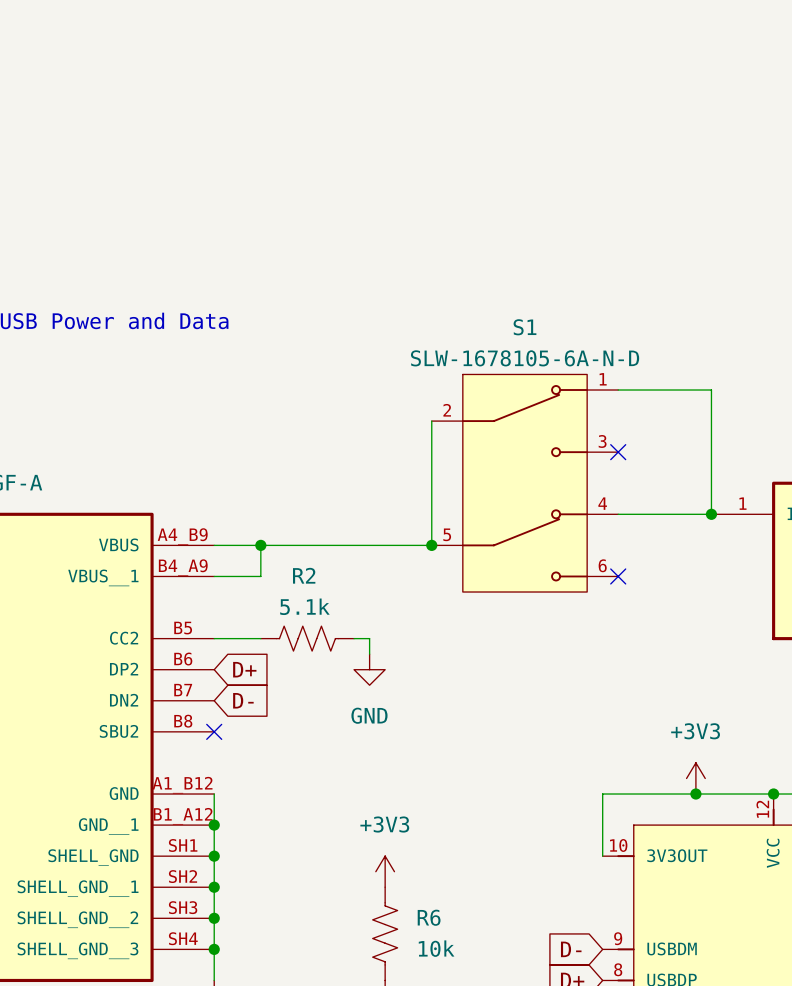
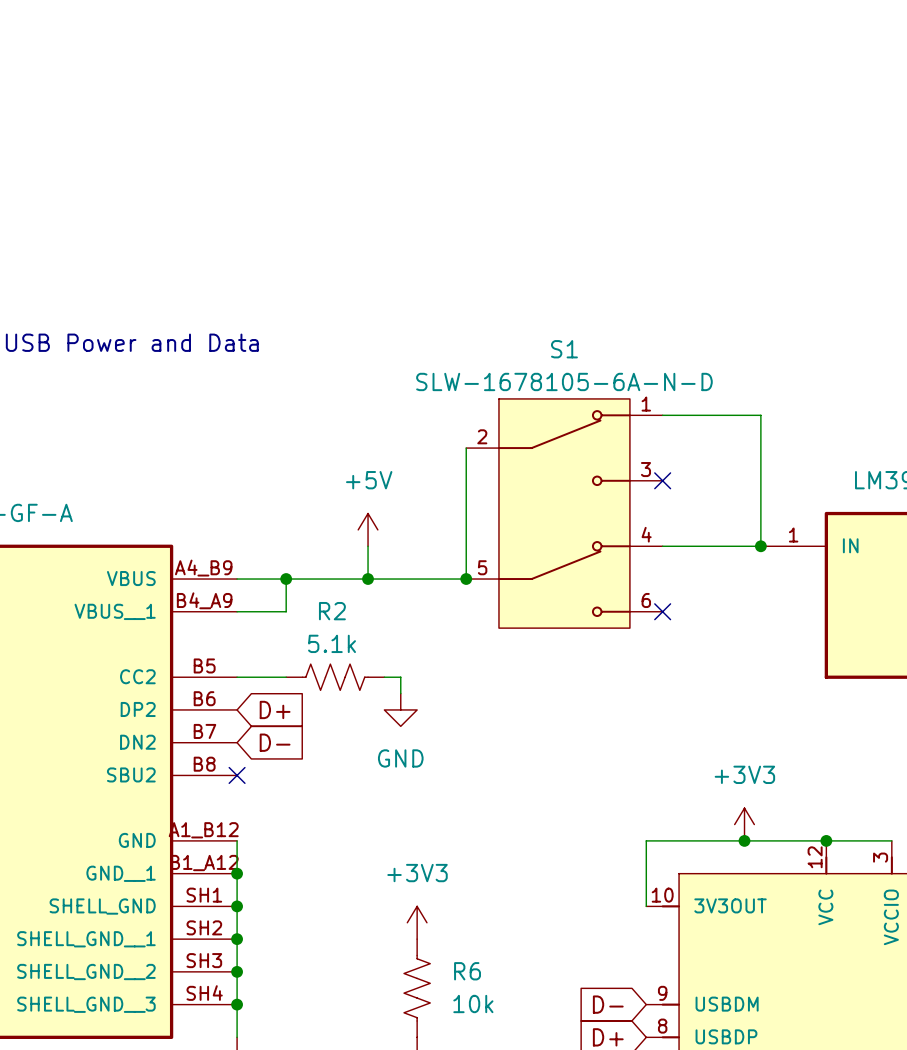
power symbol: none -> +5V (368, 529)
wire: none -> (368, 546) (368, 579)
junction: none -> (368, 579)

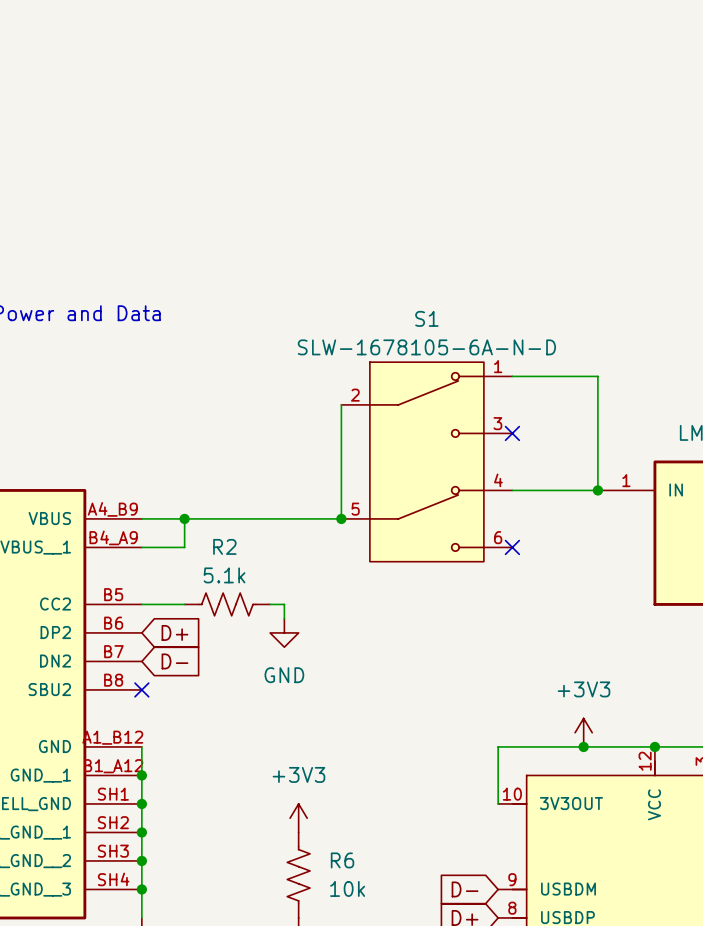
power symbol: +5V (368, 529) -> none
wire: (368, 546) (368, 579) -> none
junction: (368, 579) -> none

